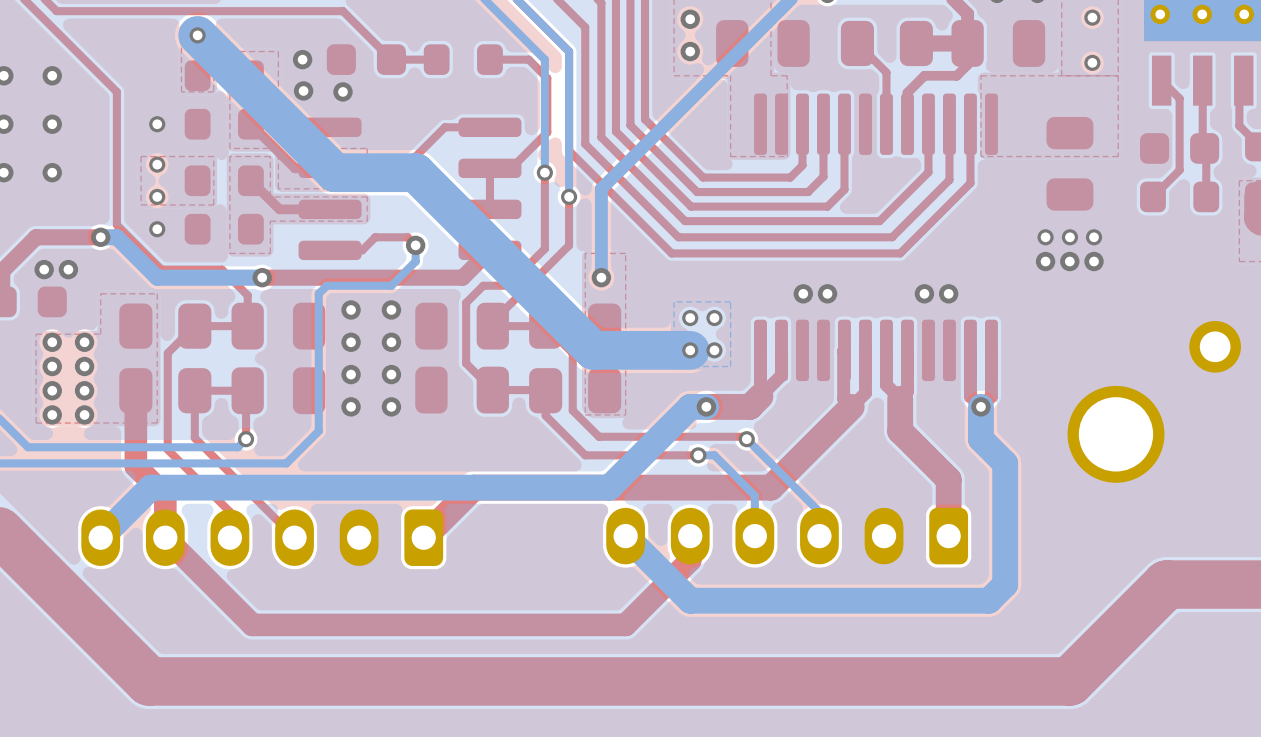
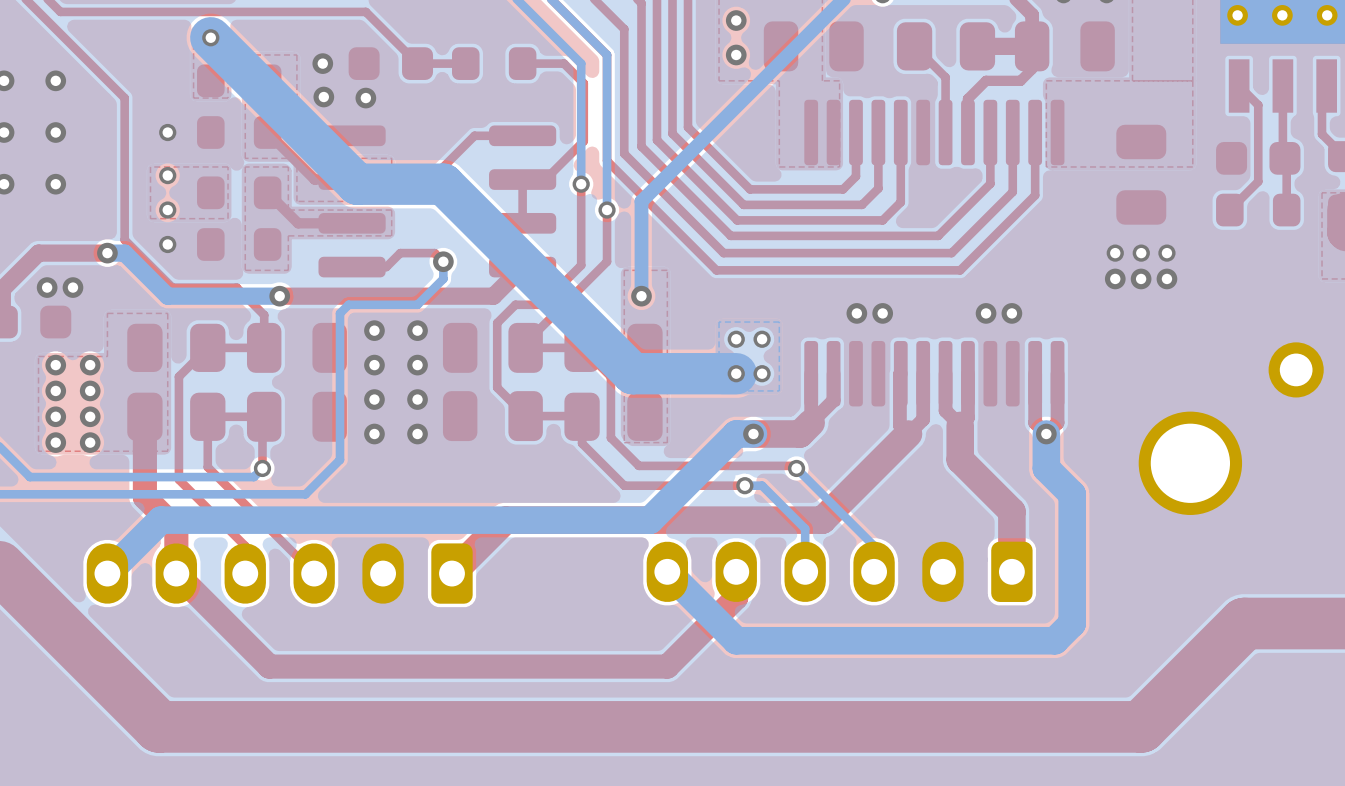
via: (1092, 17) -> none
via: (1092, 62) -> none

